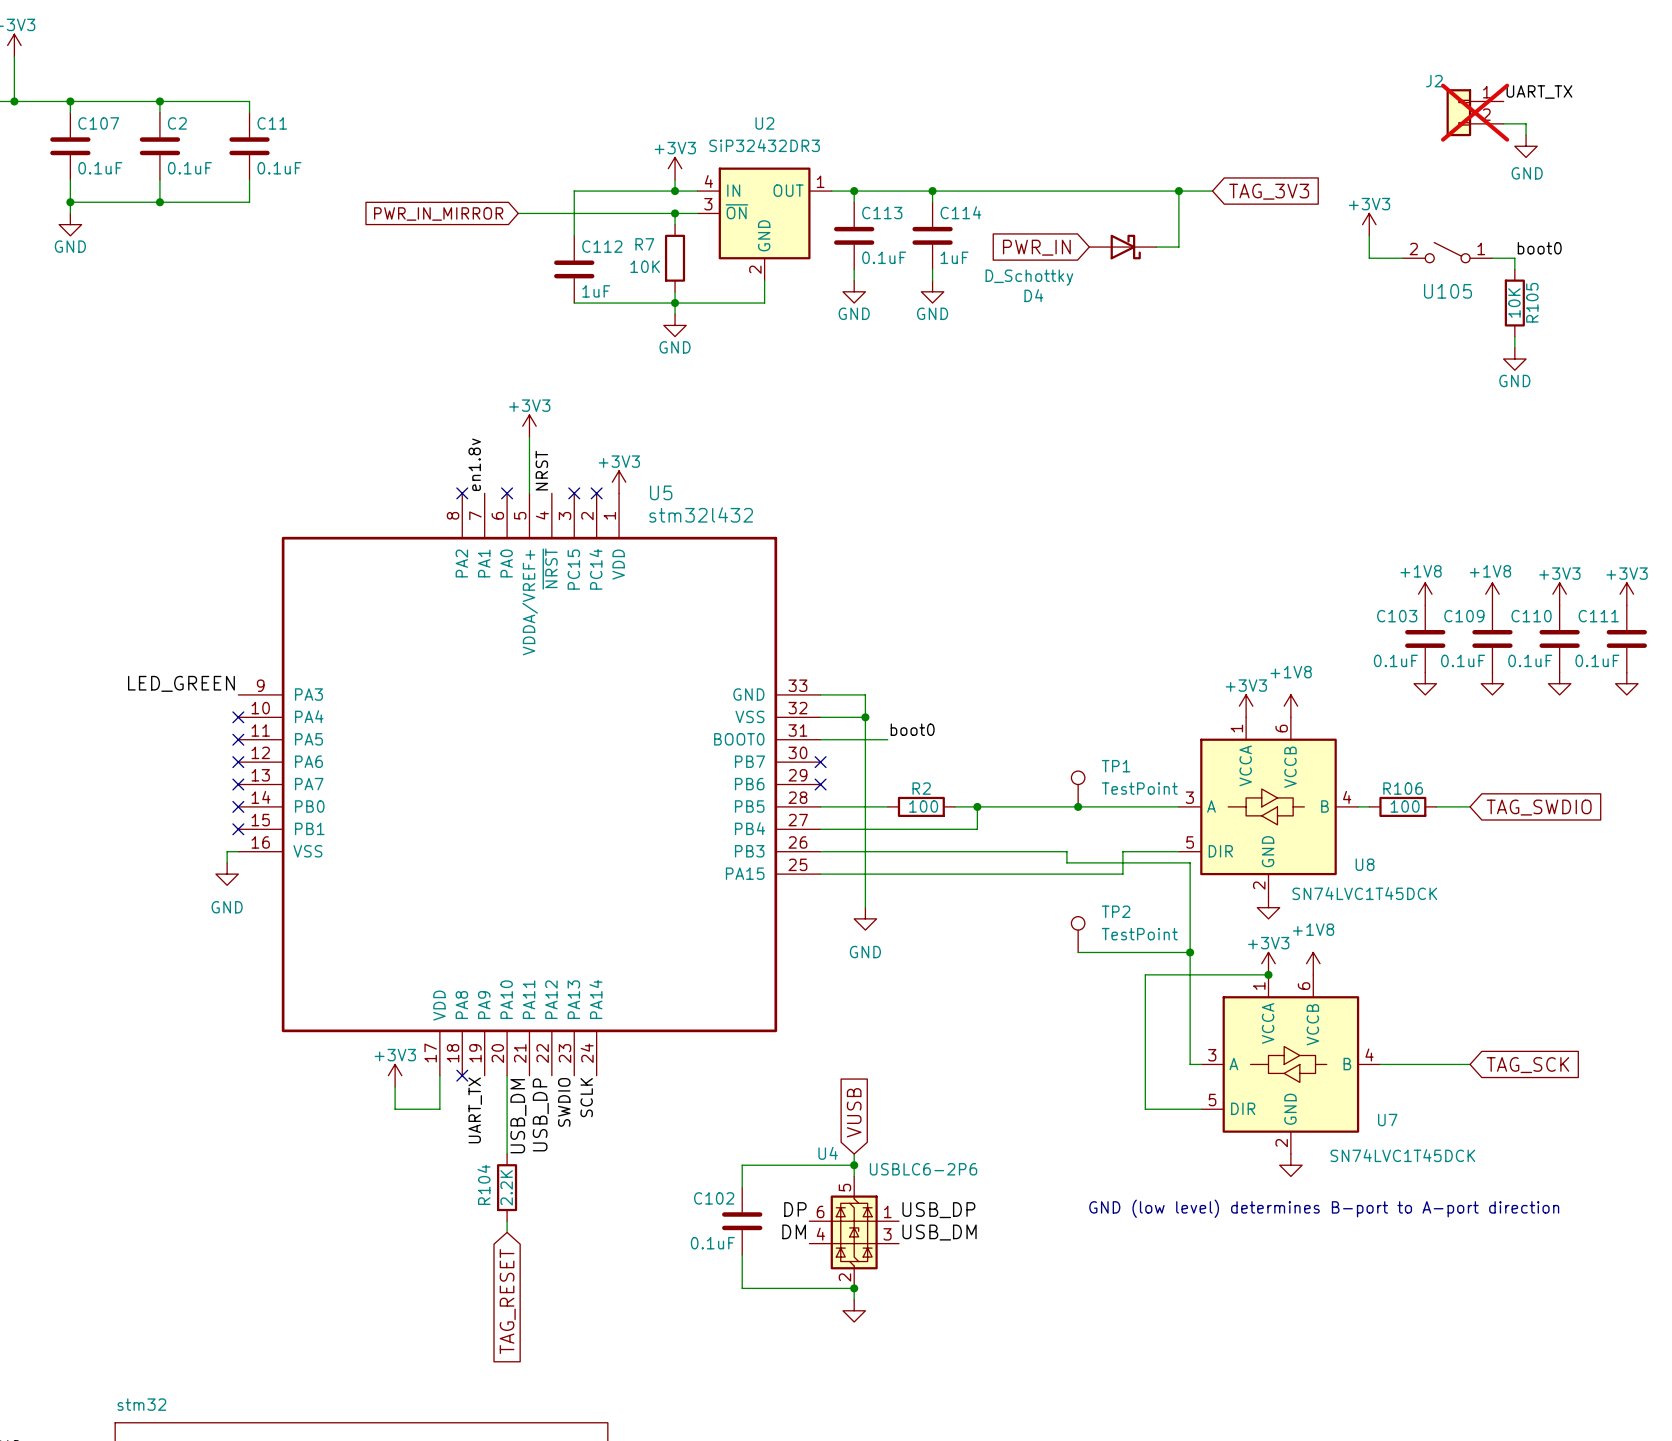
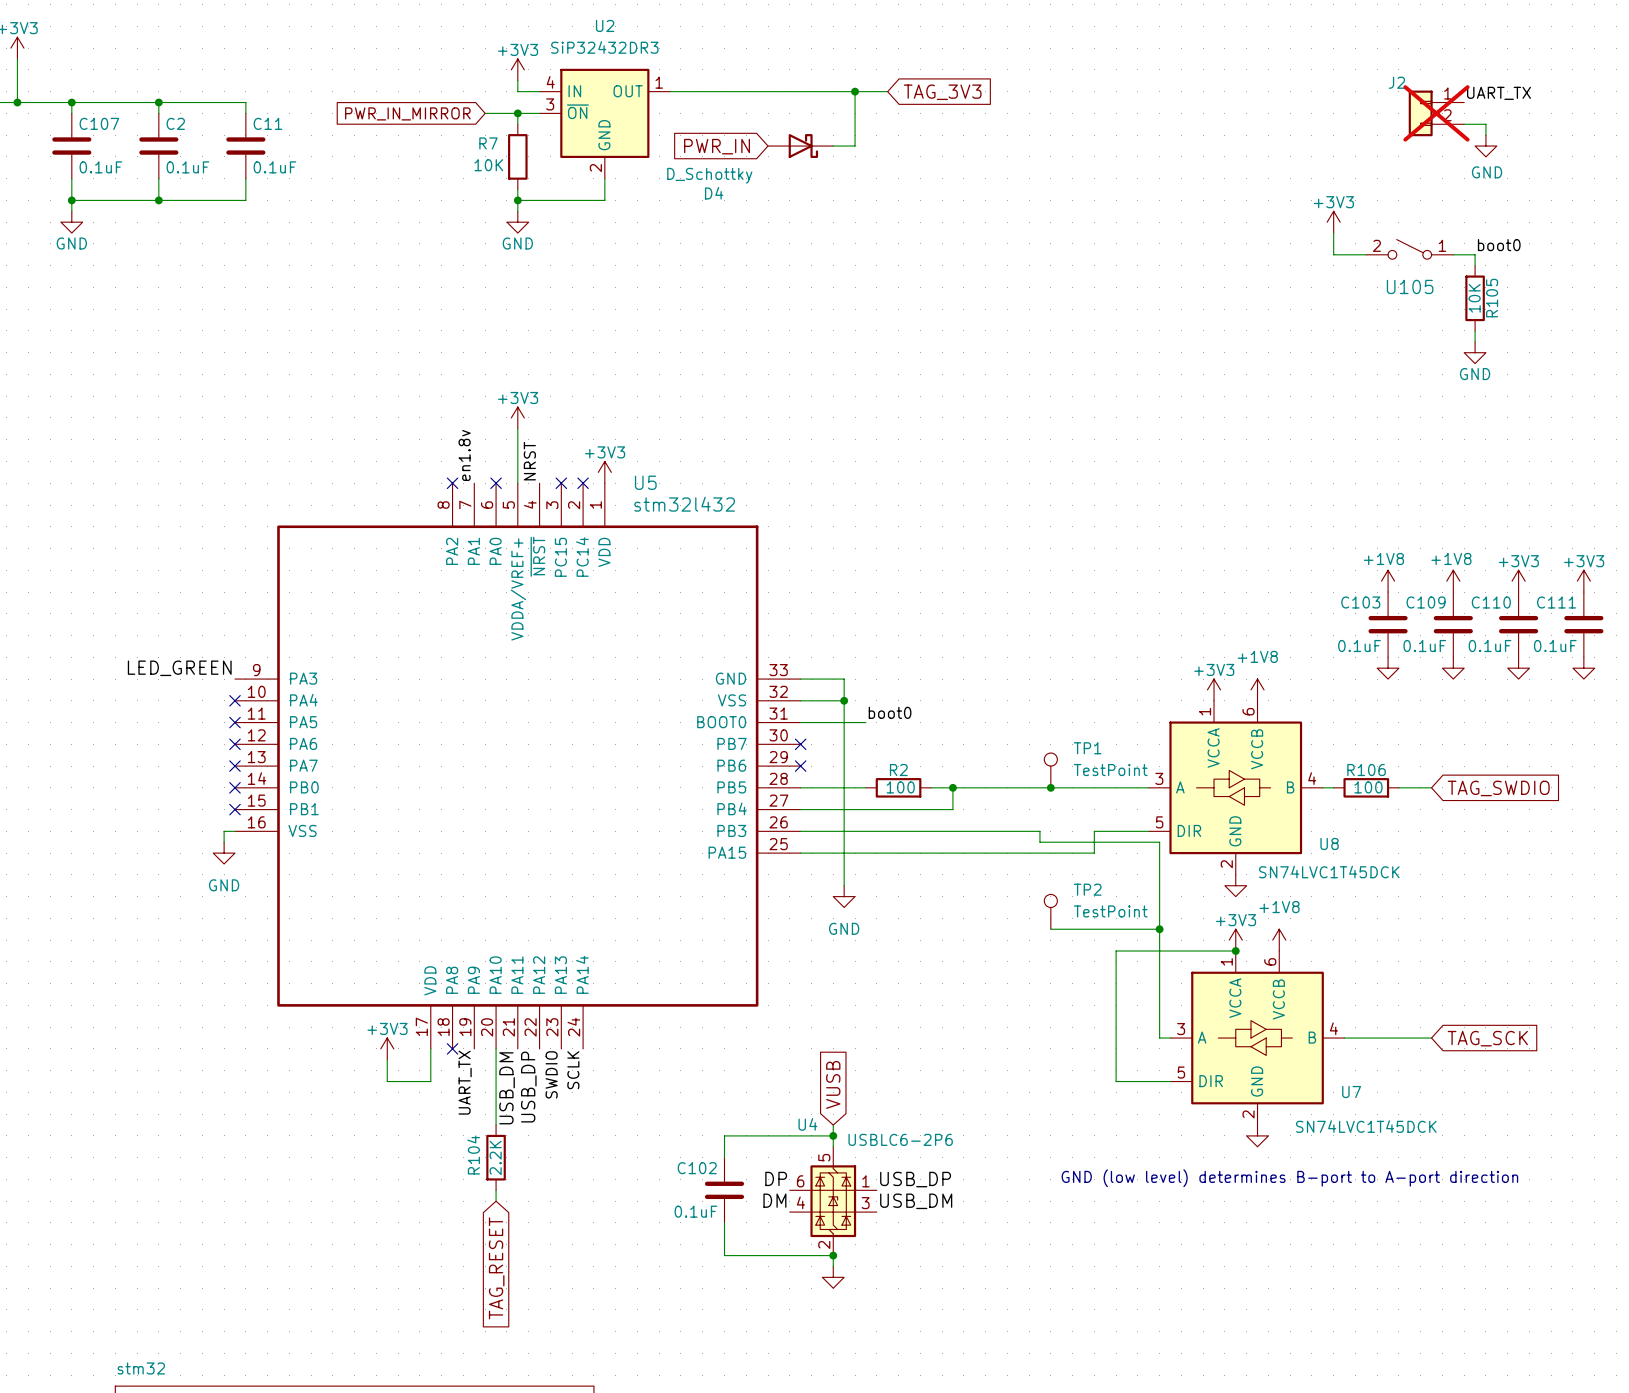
wire: none -> (517, 80) (517, 91) (539, 91)
wire: none -> (670, 91) (887, 91)
wire: none -> (855, 91) (855, 146) (833, 146)
junction: none -> (855, 91)
global label: none -> TAG_3V3 (942, 92)
wire: none -> (485, 113) (539, 113)
junction: none -> (517, 113)
global label: none -> PWR_IN (717, 146)
power symbol position: +3V3 (675, 168) -> +3V3 (517, 69)
wire: none -> (604, 178) (604, 200) (517, 200)
wire: (675, 179) (675, 191) -> none
junction: (675, 191) -> none
wire: (697, 191) (574, 191) (574, 235) -> none
wire: (831, 191) (1212, 191) -> none
wire: (854, 191) (854, 202) -> none
junction: (854, 191) -> none
wire: (932, 191) (932, 202) -> none
junction: (932, 191) -> none
wire: (1178, 191) (1178, 247) (1156, 247) -> none
junction: (1178, 191) -> none
global label: TAG_3V3 (1269, 191) -> none
junction: none -> (517, 200)
global label position: PWR_IN_MIRROR (438, 213) -> PWR_IN_MIRROR (407, 113)
wire: (518, 213) (697, 213) -> none
wire: (675, 213) (675, 224) -> (517, 113) (517, 124)
junction: (675, 213) -> none
power symbol: none -> GND (517, 222)
U2 position: (764, 224) -> (604, 123)
C113: 0.1uF (854, 235) -> none
C114: 1uF (932, 235) -> none
global label: PWR_IN (1036, 247) -> none
D4 position: (1122, 247) -> (800, 146)
R7 position: (675, 258) -> (517, 156)
C112: 1uF (574, 269) -> none
wire: (854, 269) (854, 280) -> none
wire: (932, 269) (932, 280) -> none
wire: (764, 280) (764, 303) (574, 303) -> none
wire: (675, 291) (675, 314) -> (517, 189) (517, 211)
power symbol: GND (854, 291) -> none
power symbol: GND (932, 291) -> none
junction: (675, 303) -> none
power symbol: GND (675, 325) -> none

